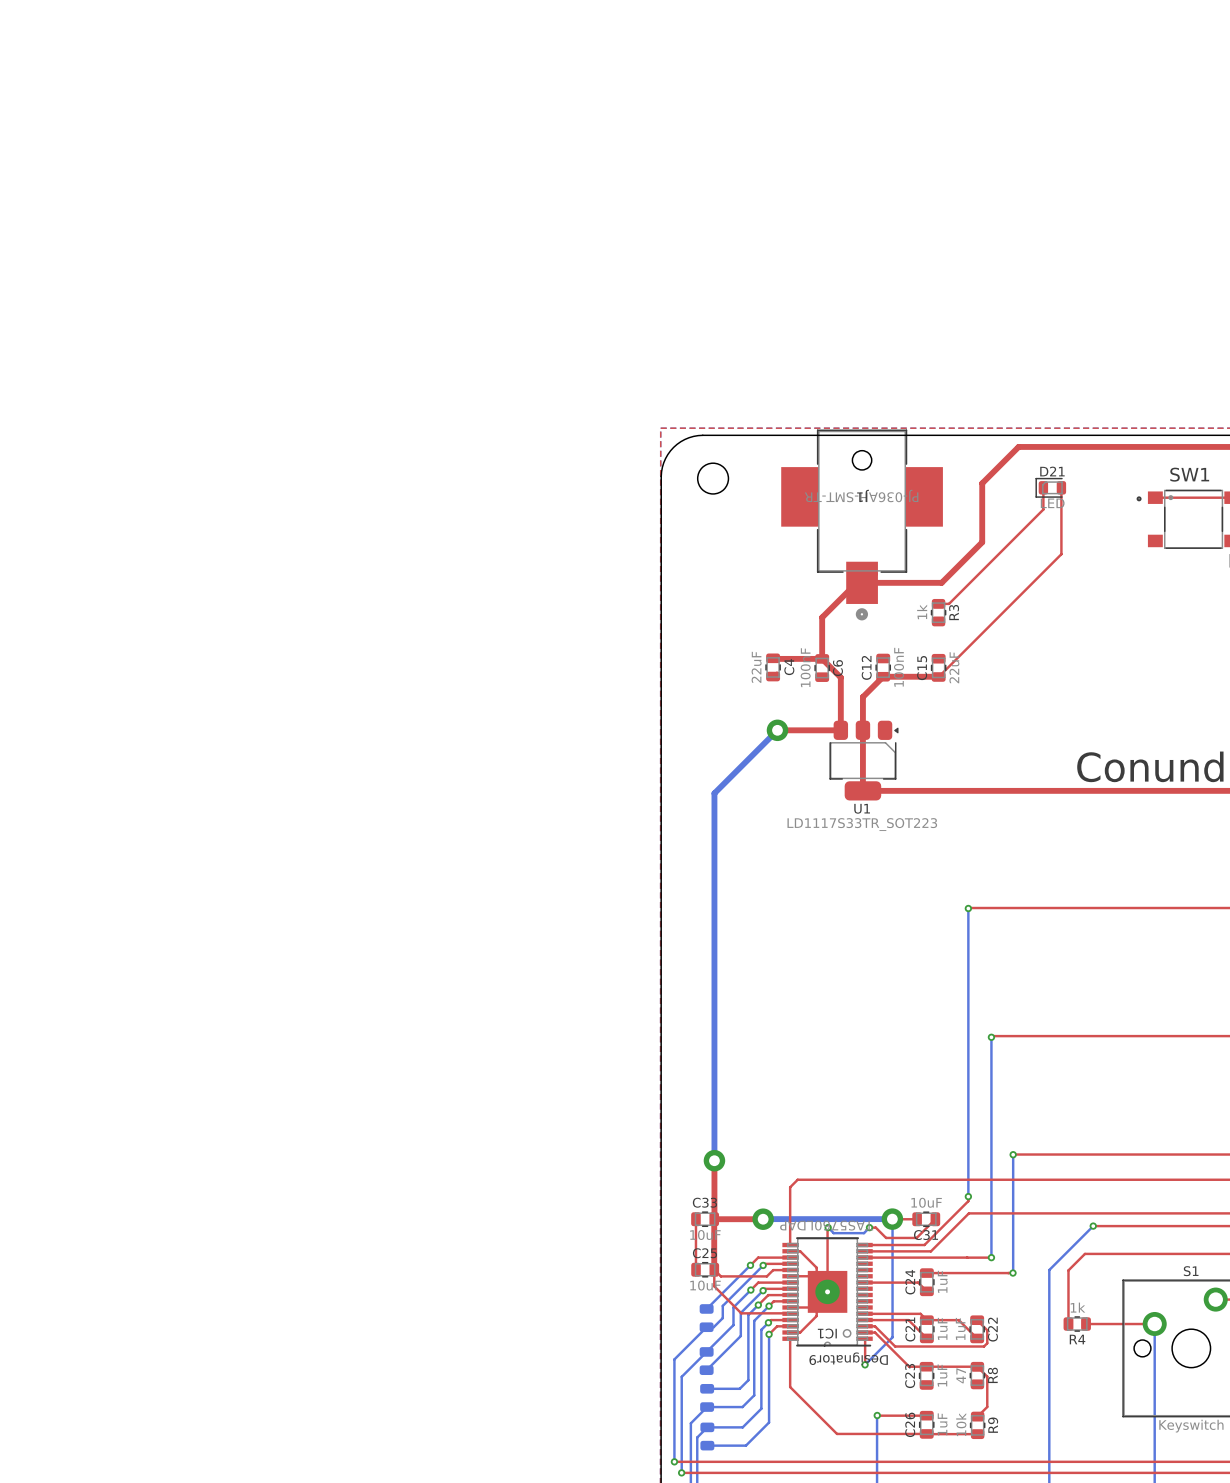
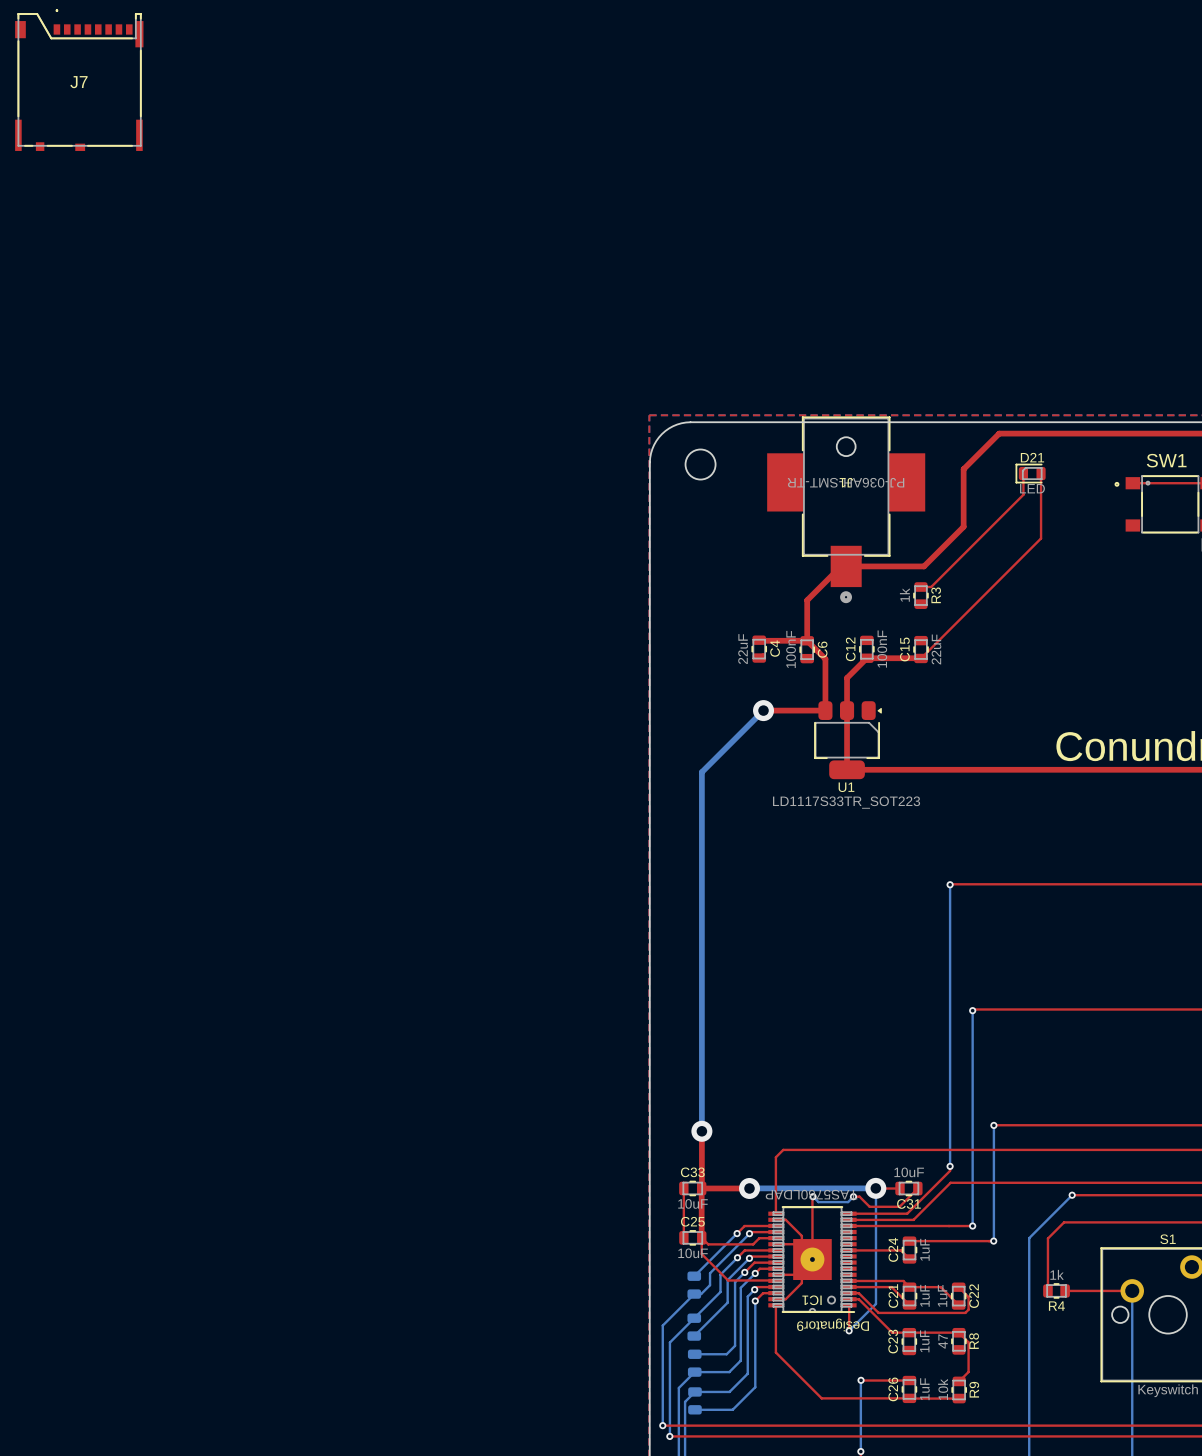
J7: none -> (79, 80)

